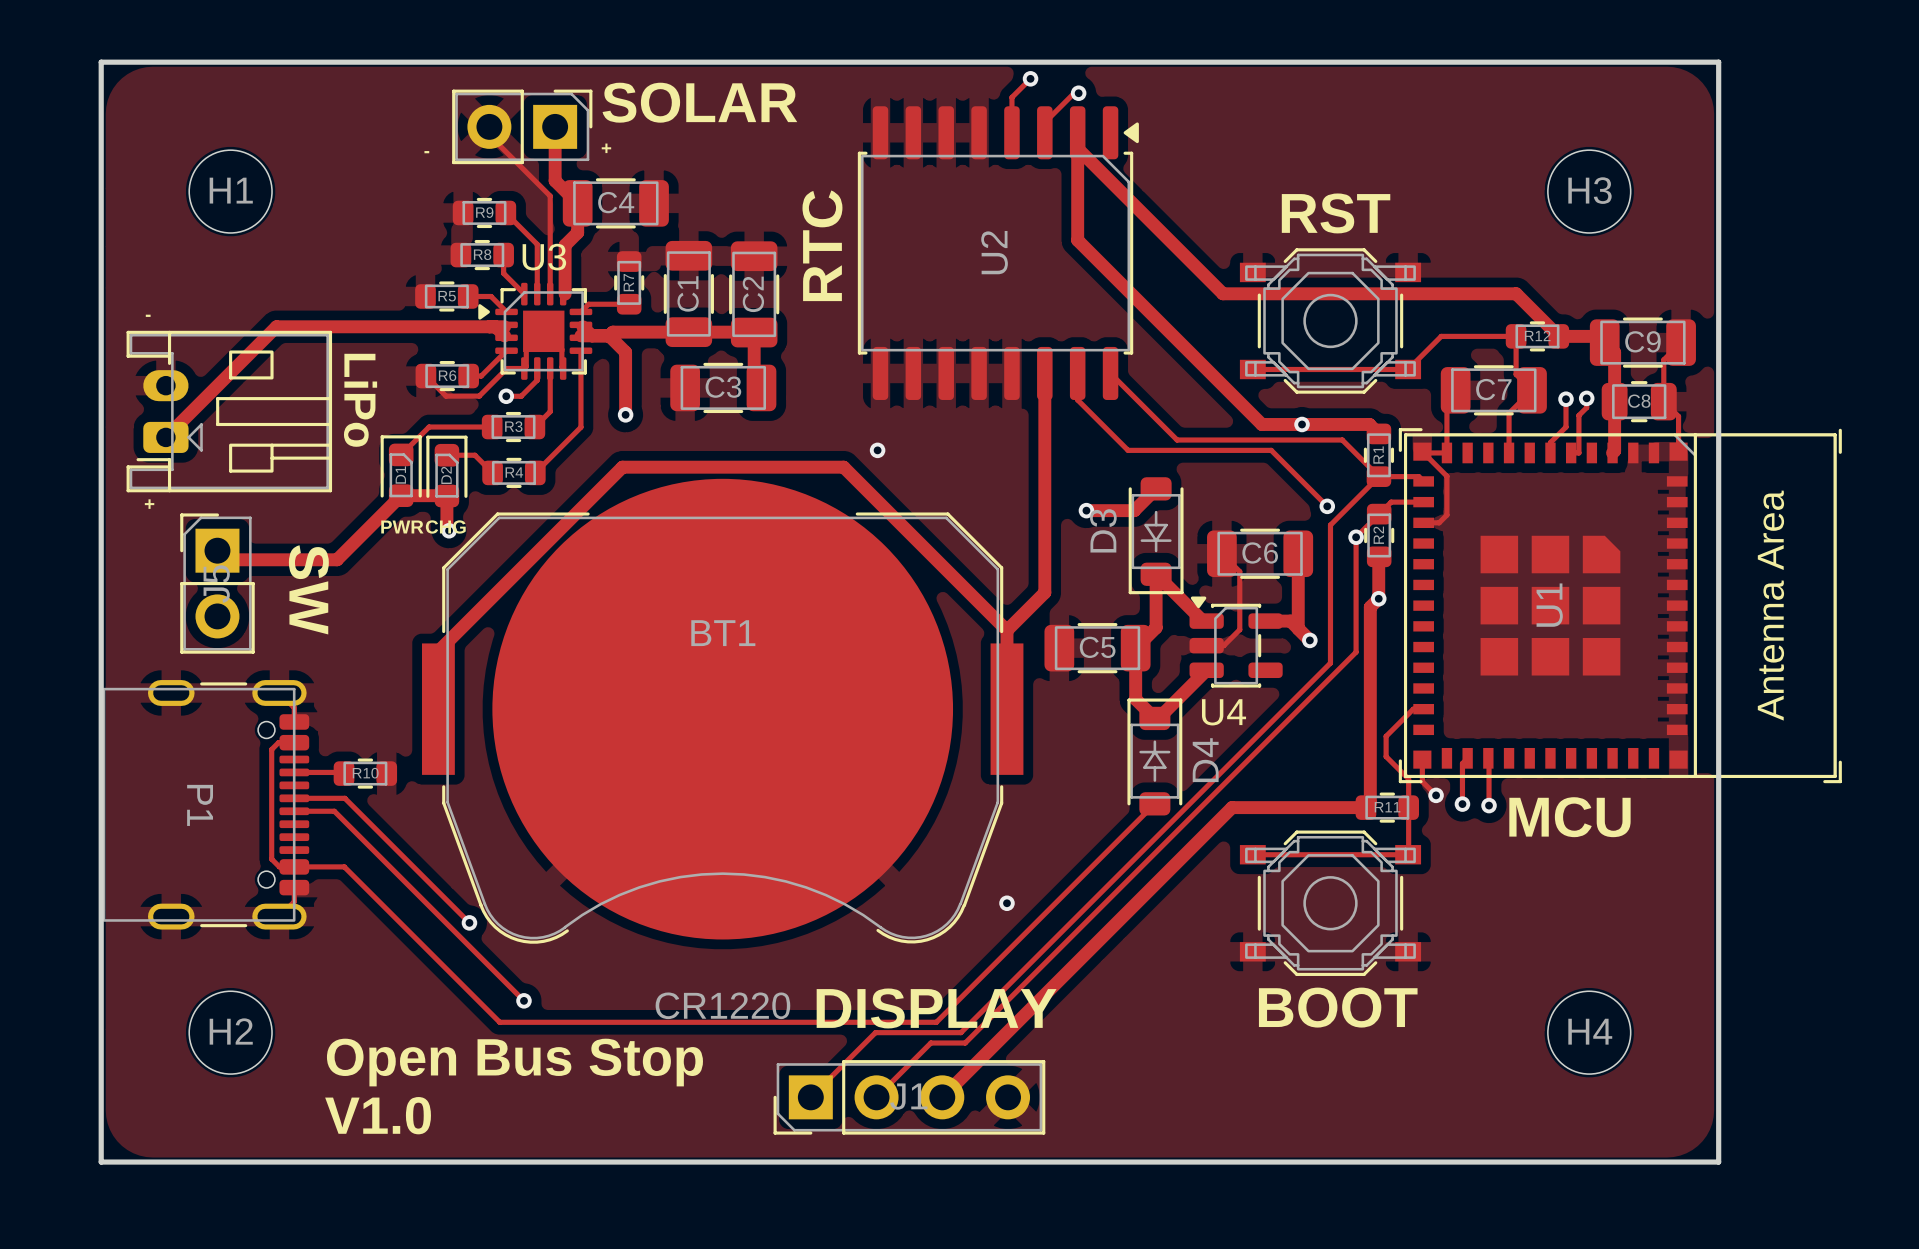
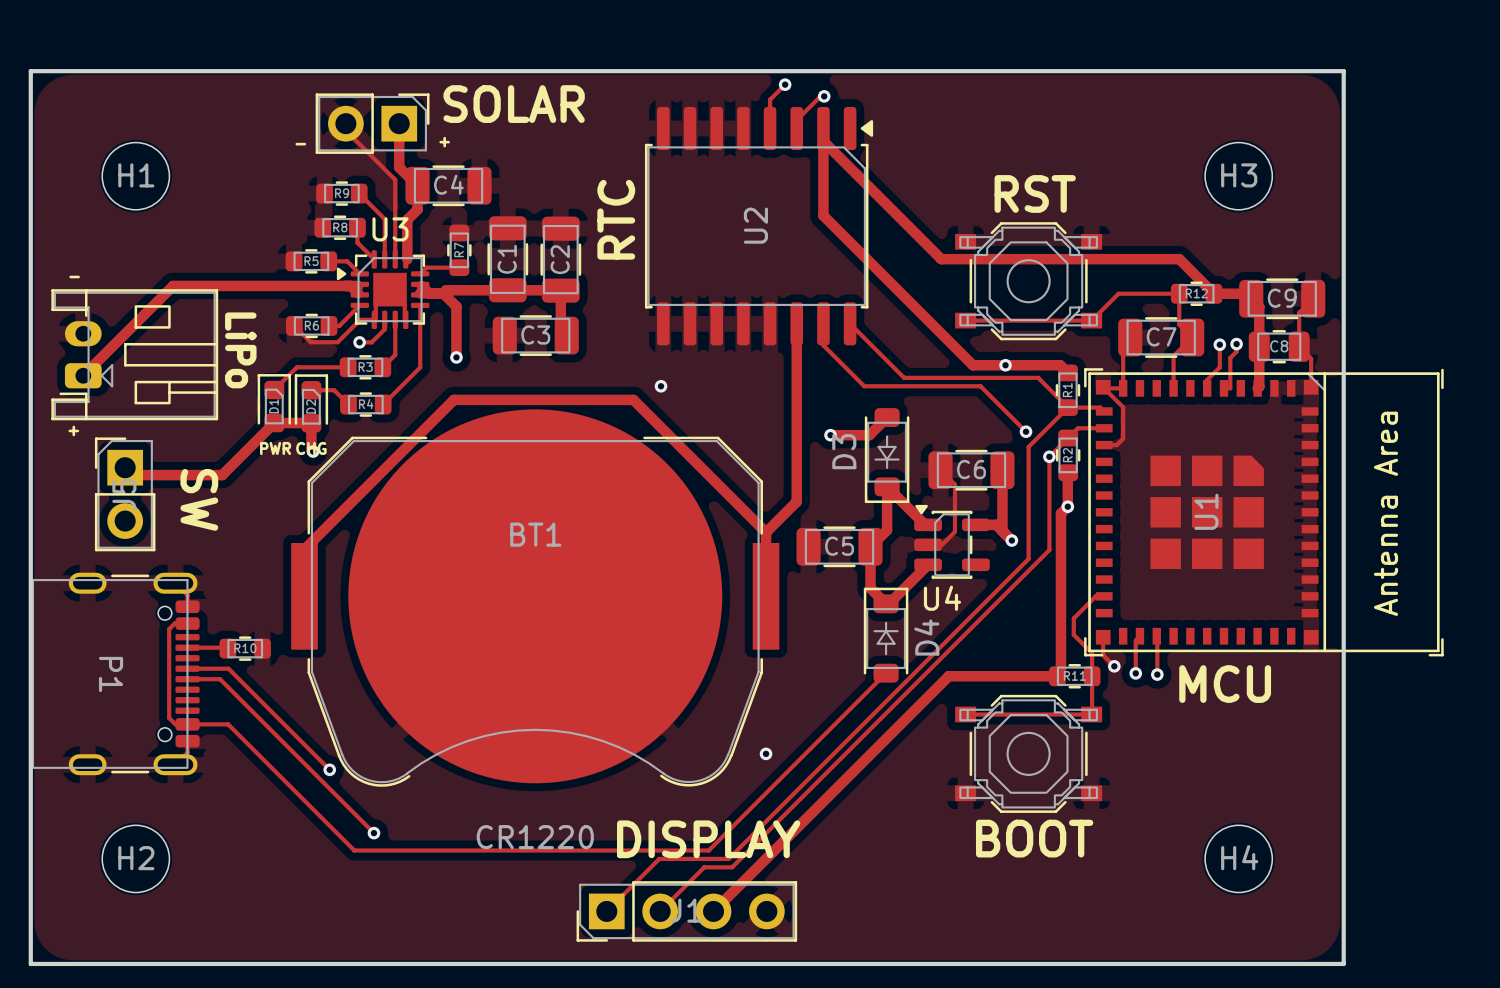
text: Open Bus Stop (514, 1062) -> none
text: V1.0 (378, 1115) -> none

